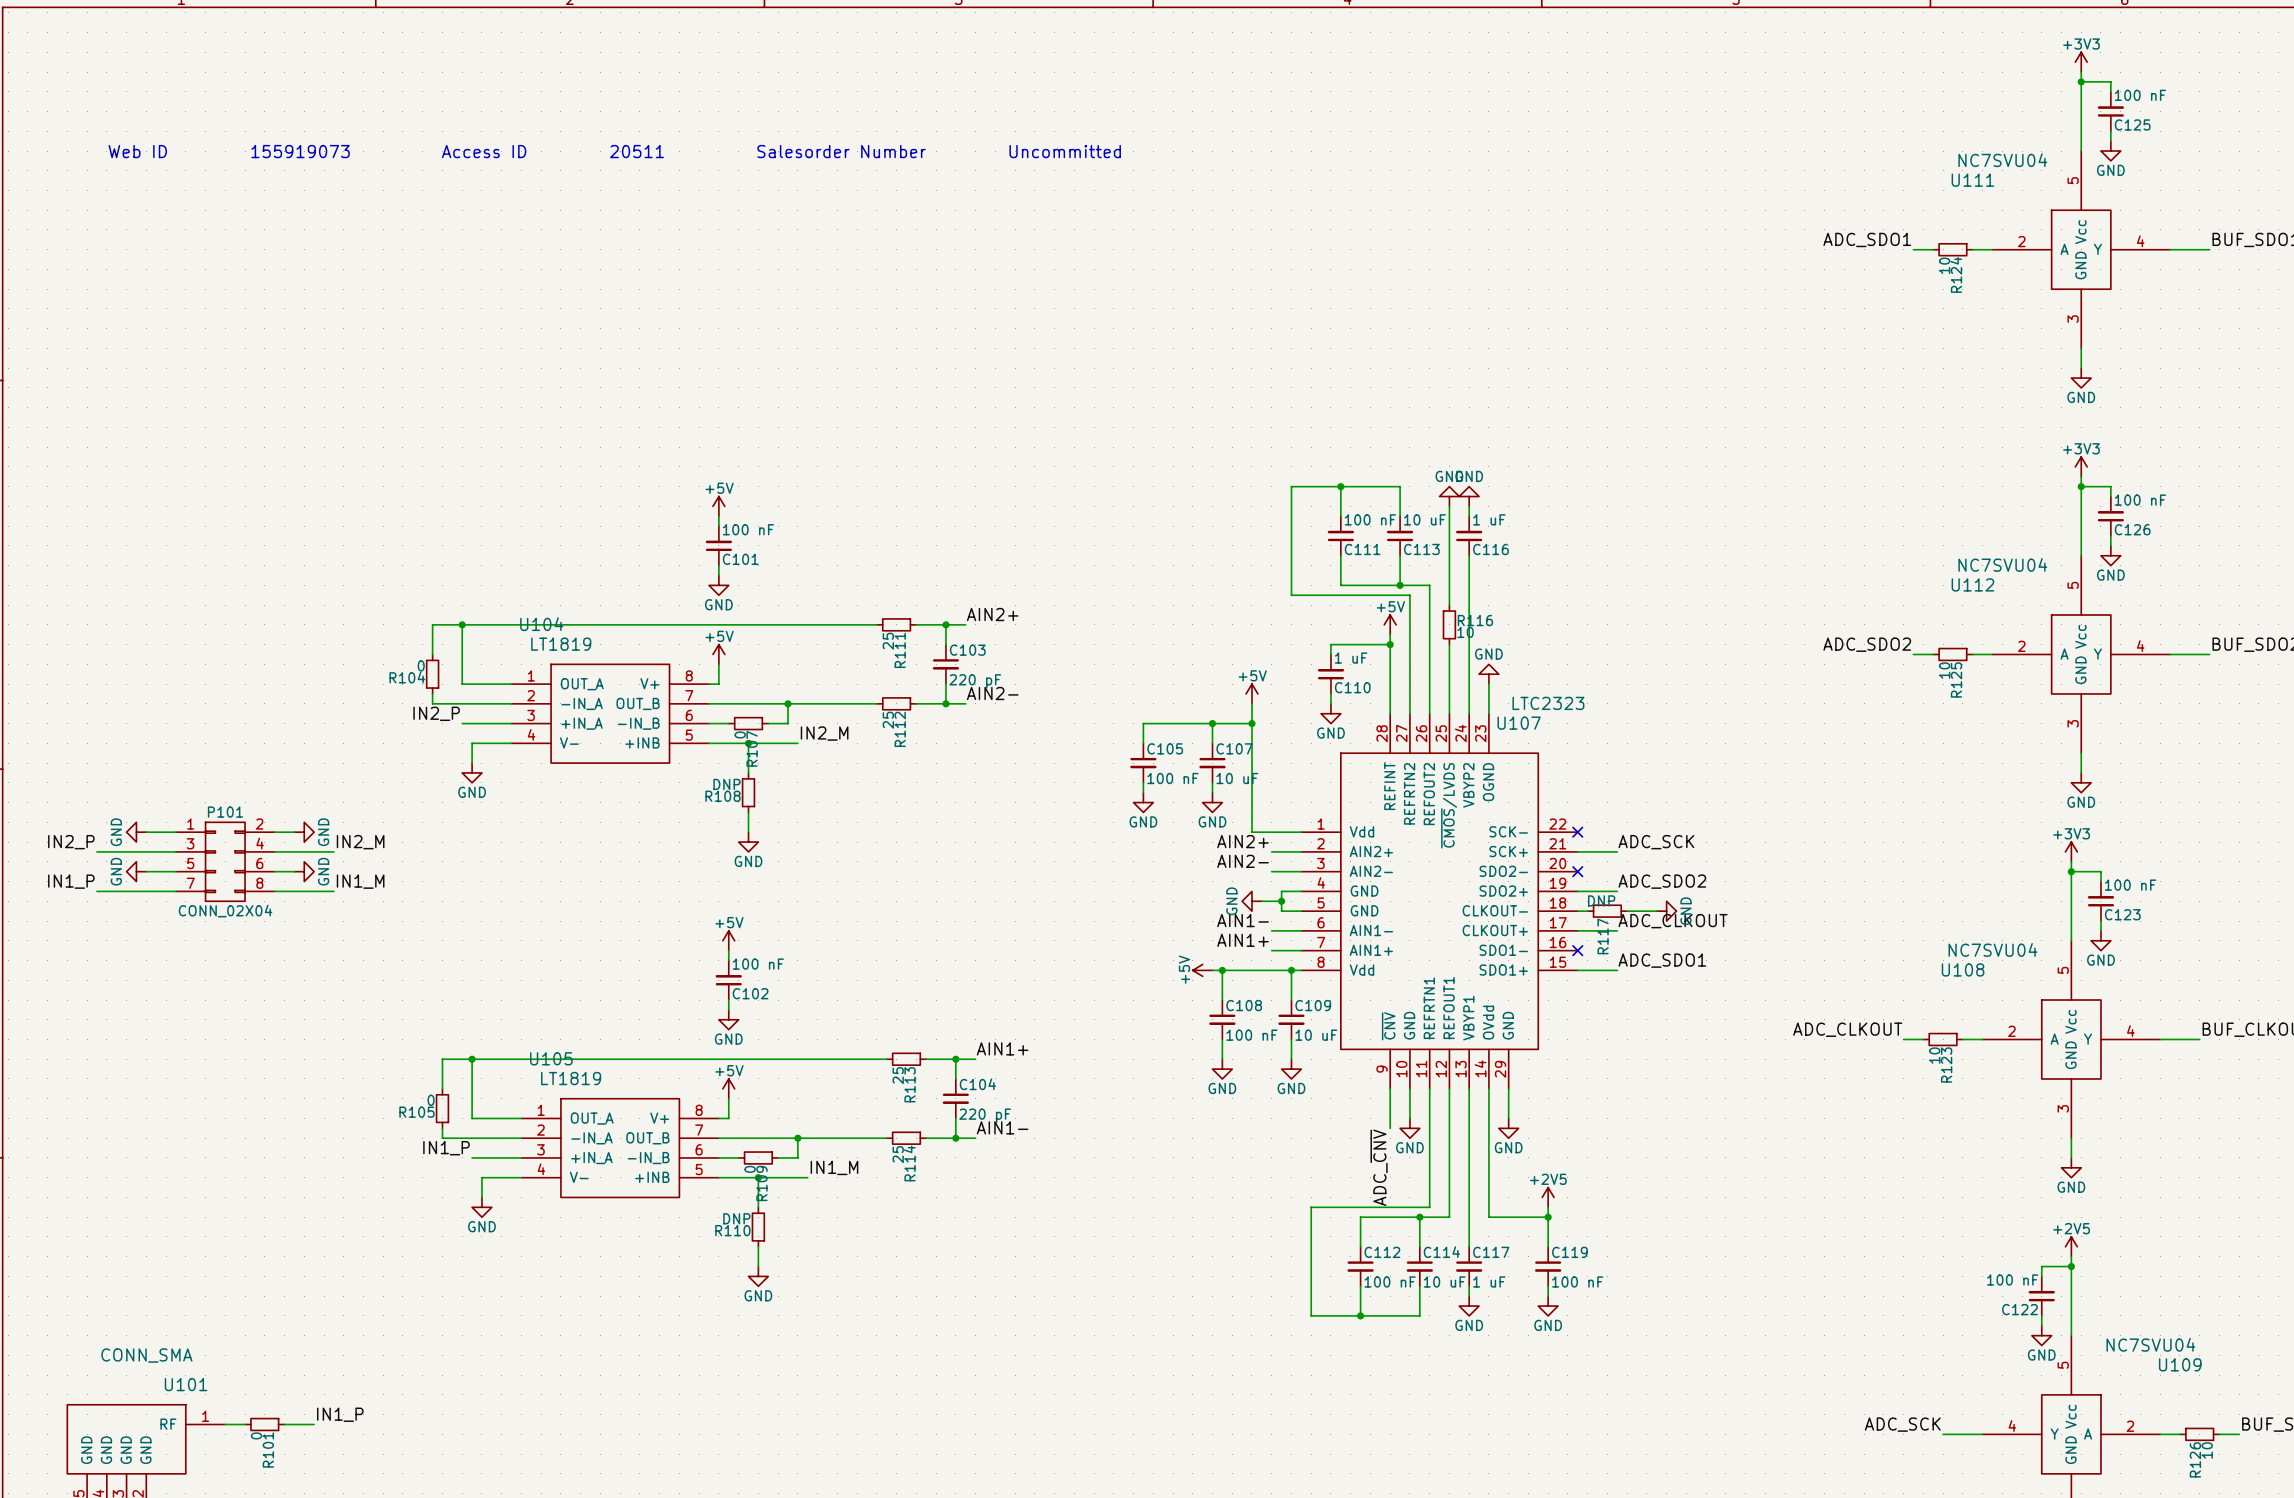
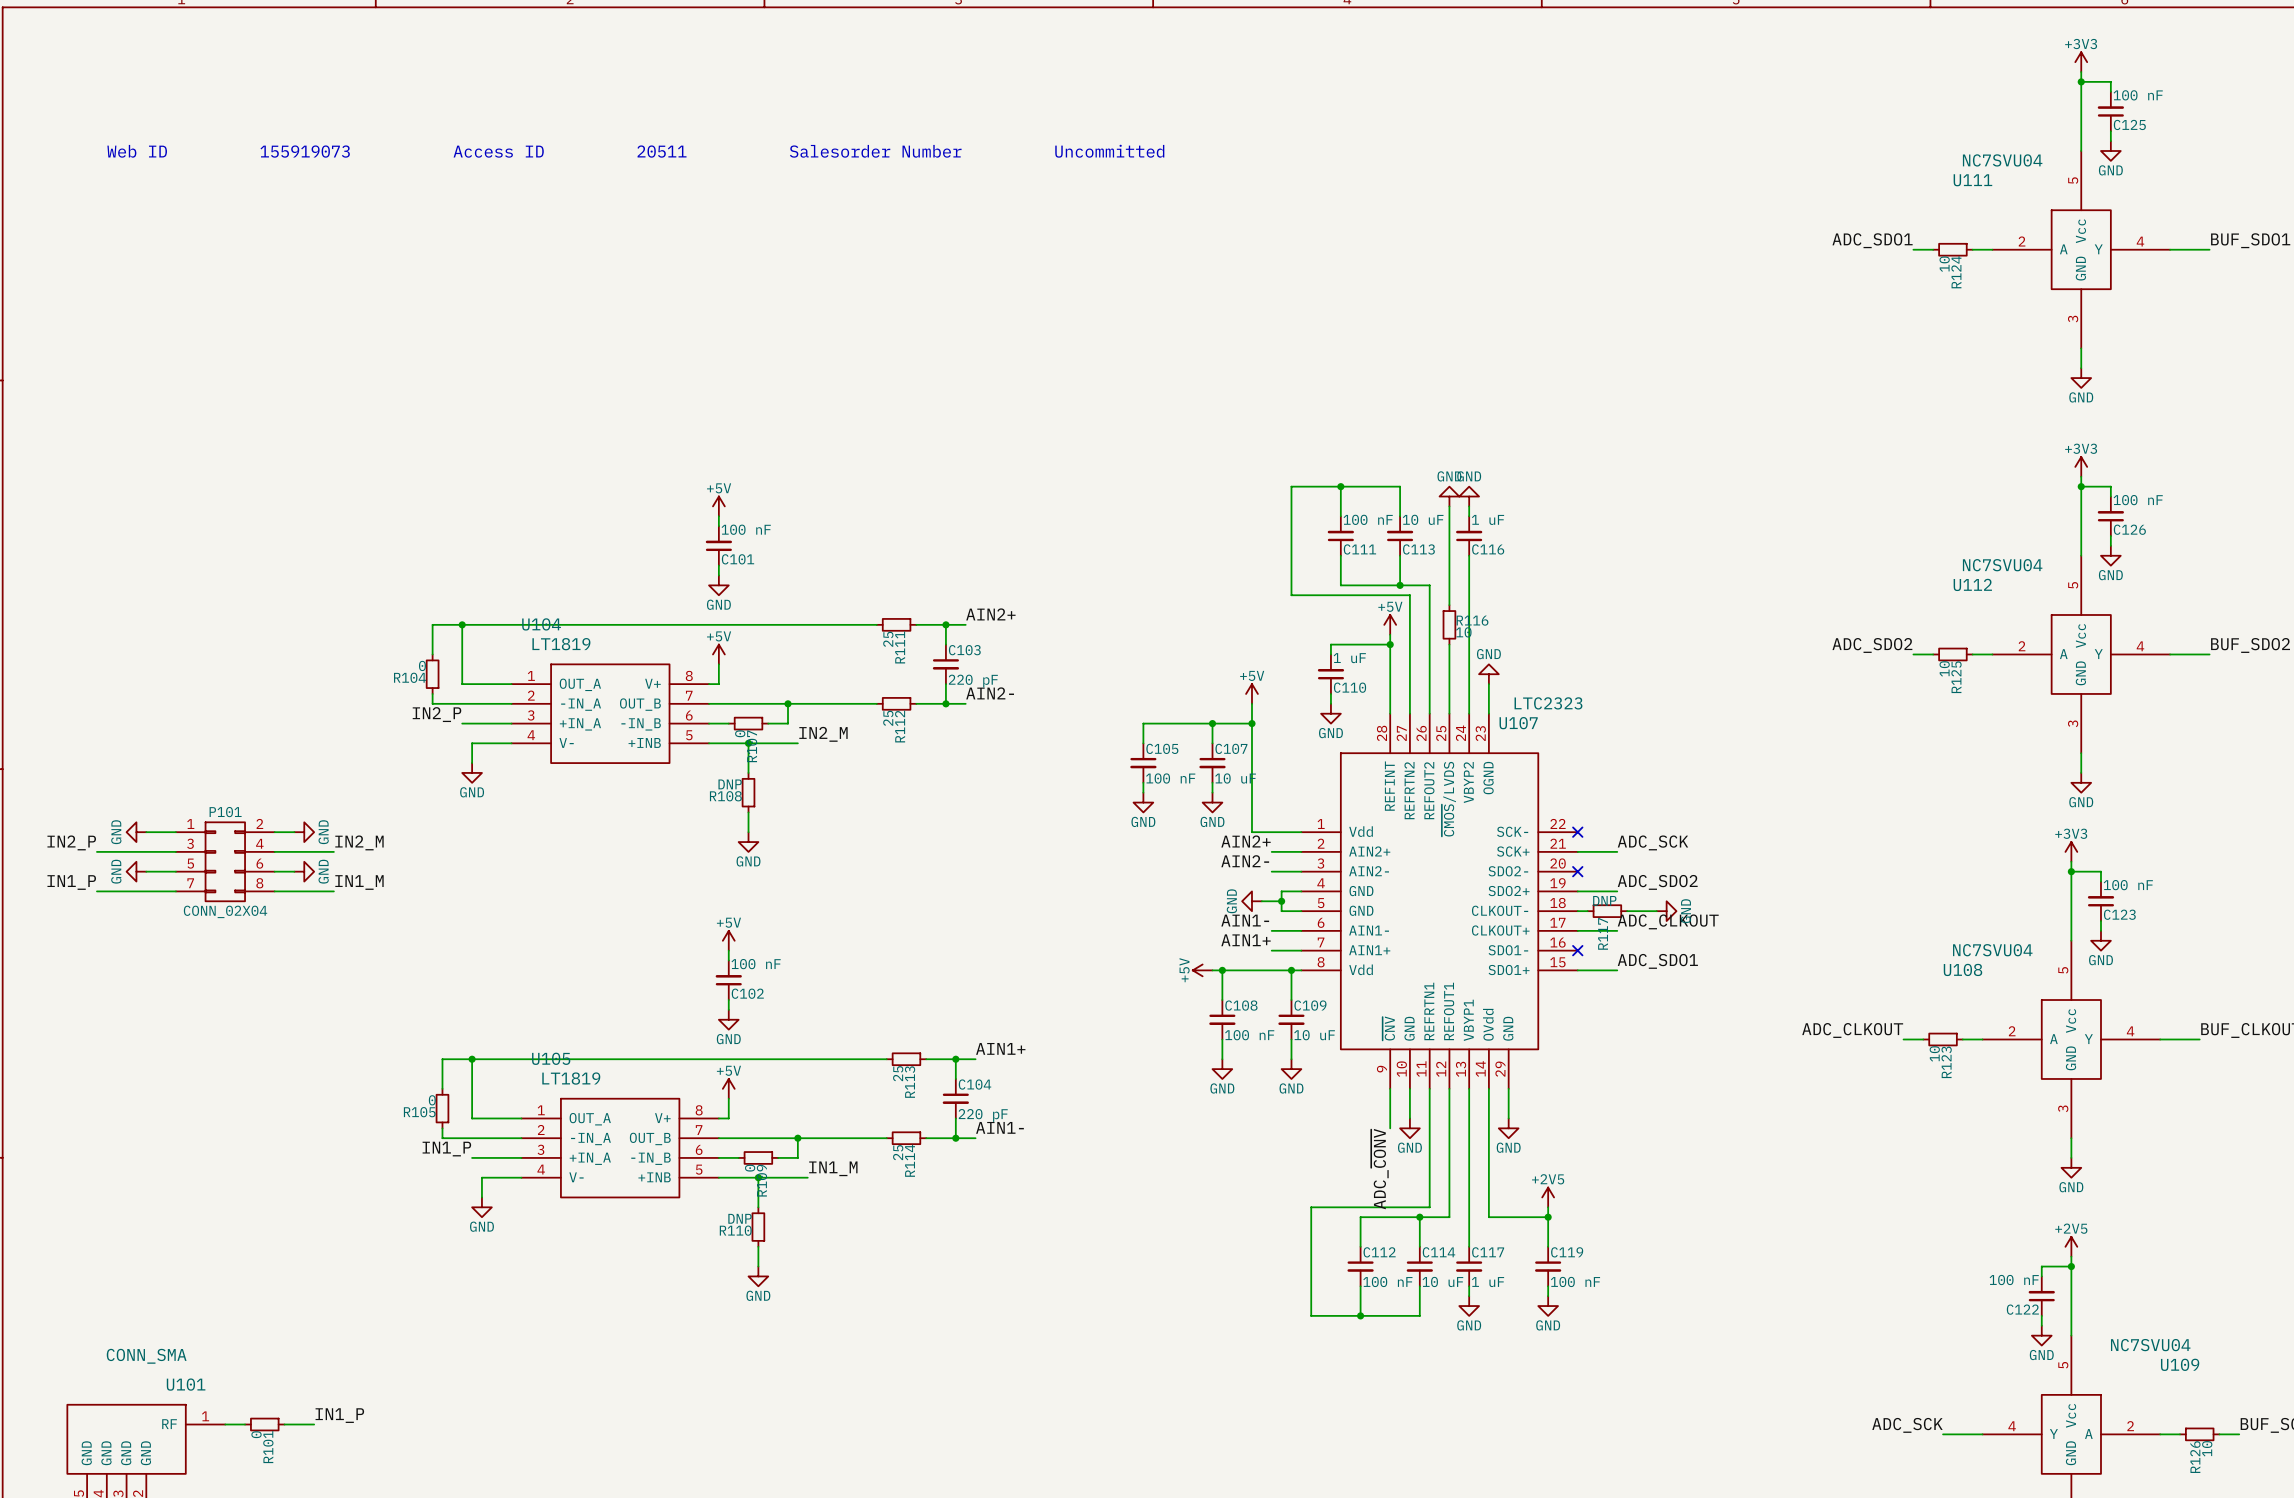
label: ADC_~{CNV} (1379, 1167) -> ADC_~{CONV} (1379, 1169)

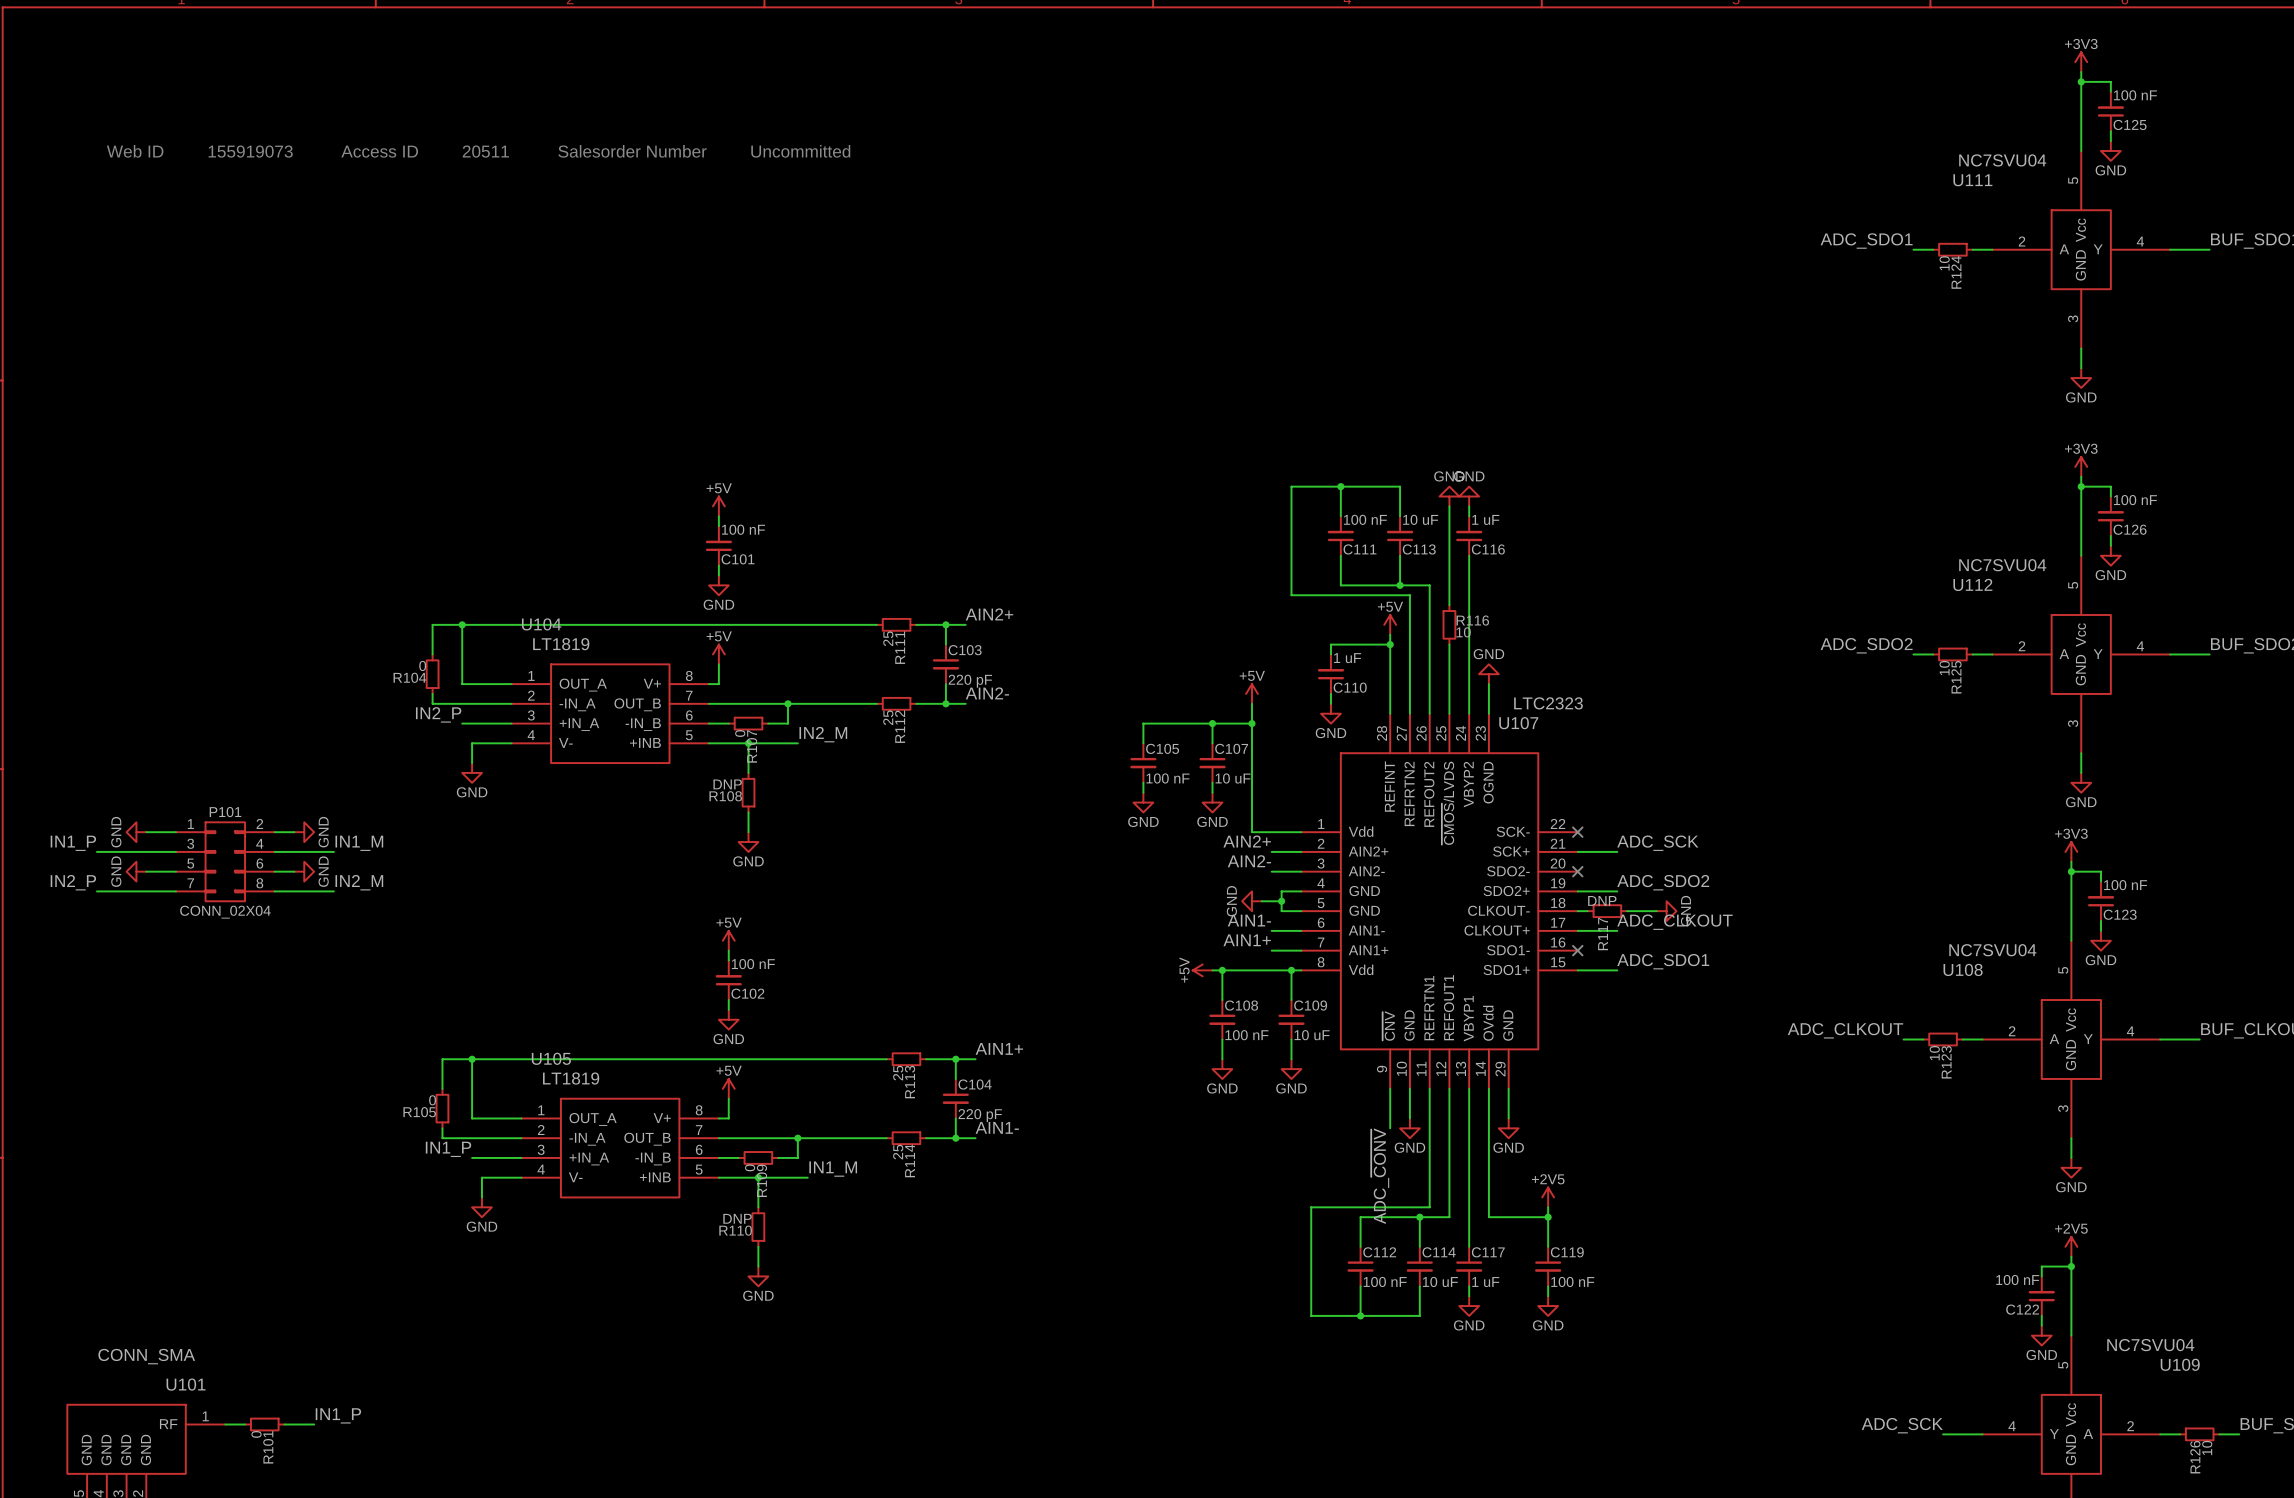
label: IN2_P (71, 842) -> IN1_P (73, 843)
label: IN2_M (359, 842) -> IN1_M (359, 843)
label: IN1_P (71, 882) -> IN2_P (73, 882)
label: IN1_M (359, 882) -> IN2_M (359, 882)

